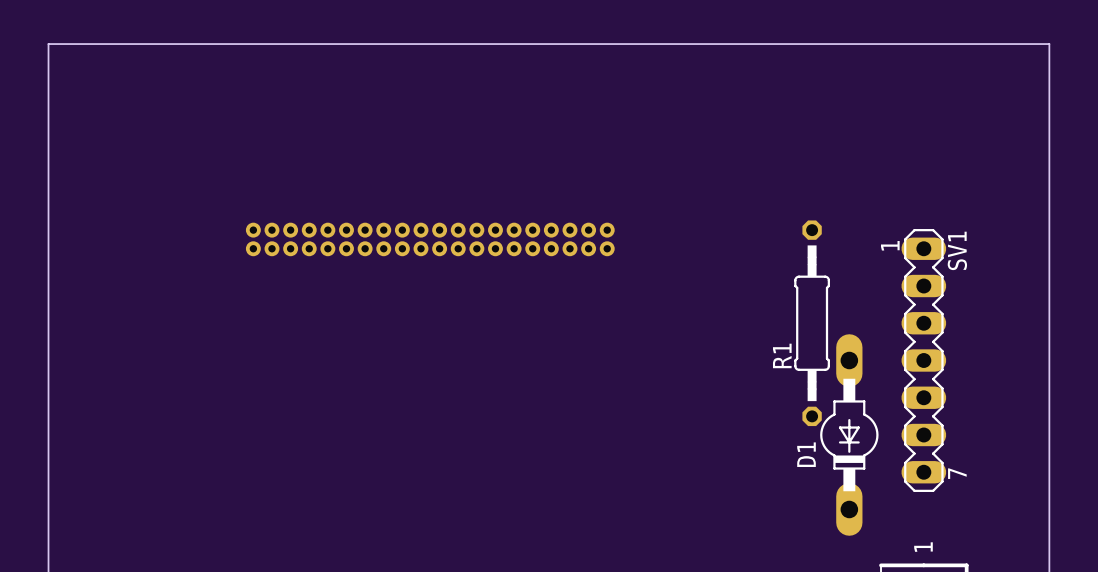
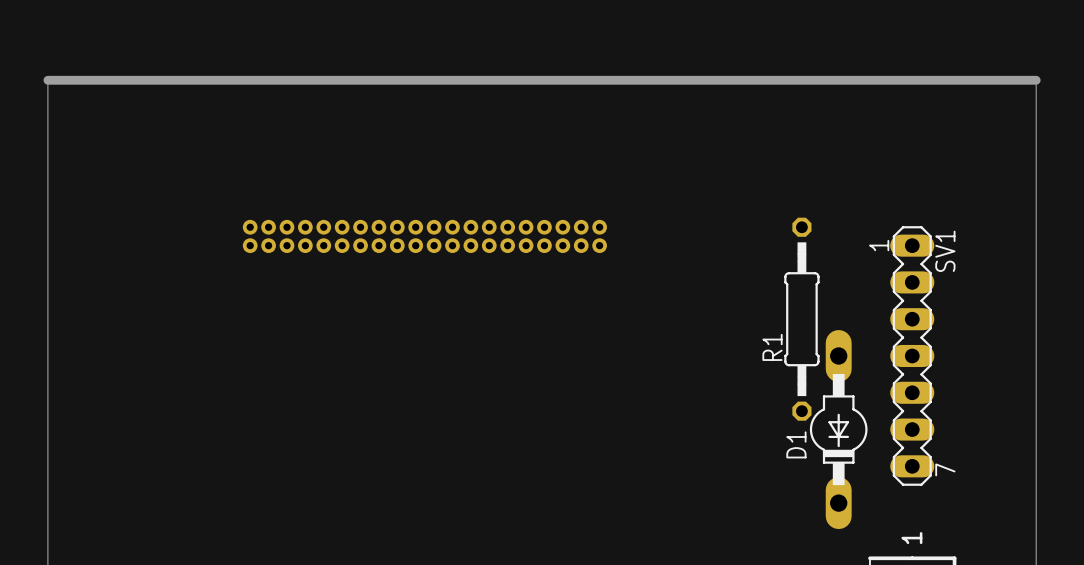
board edge: (48, 81) (48, 44) (1049, 44) (1049, 81) -> (47, 80) (1036, 80)

